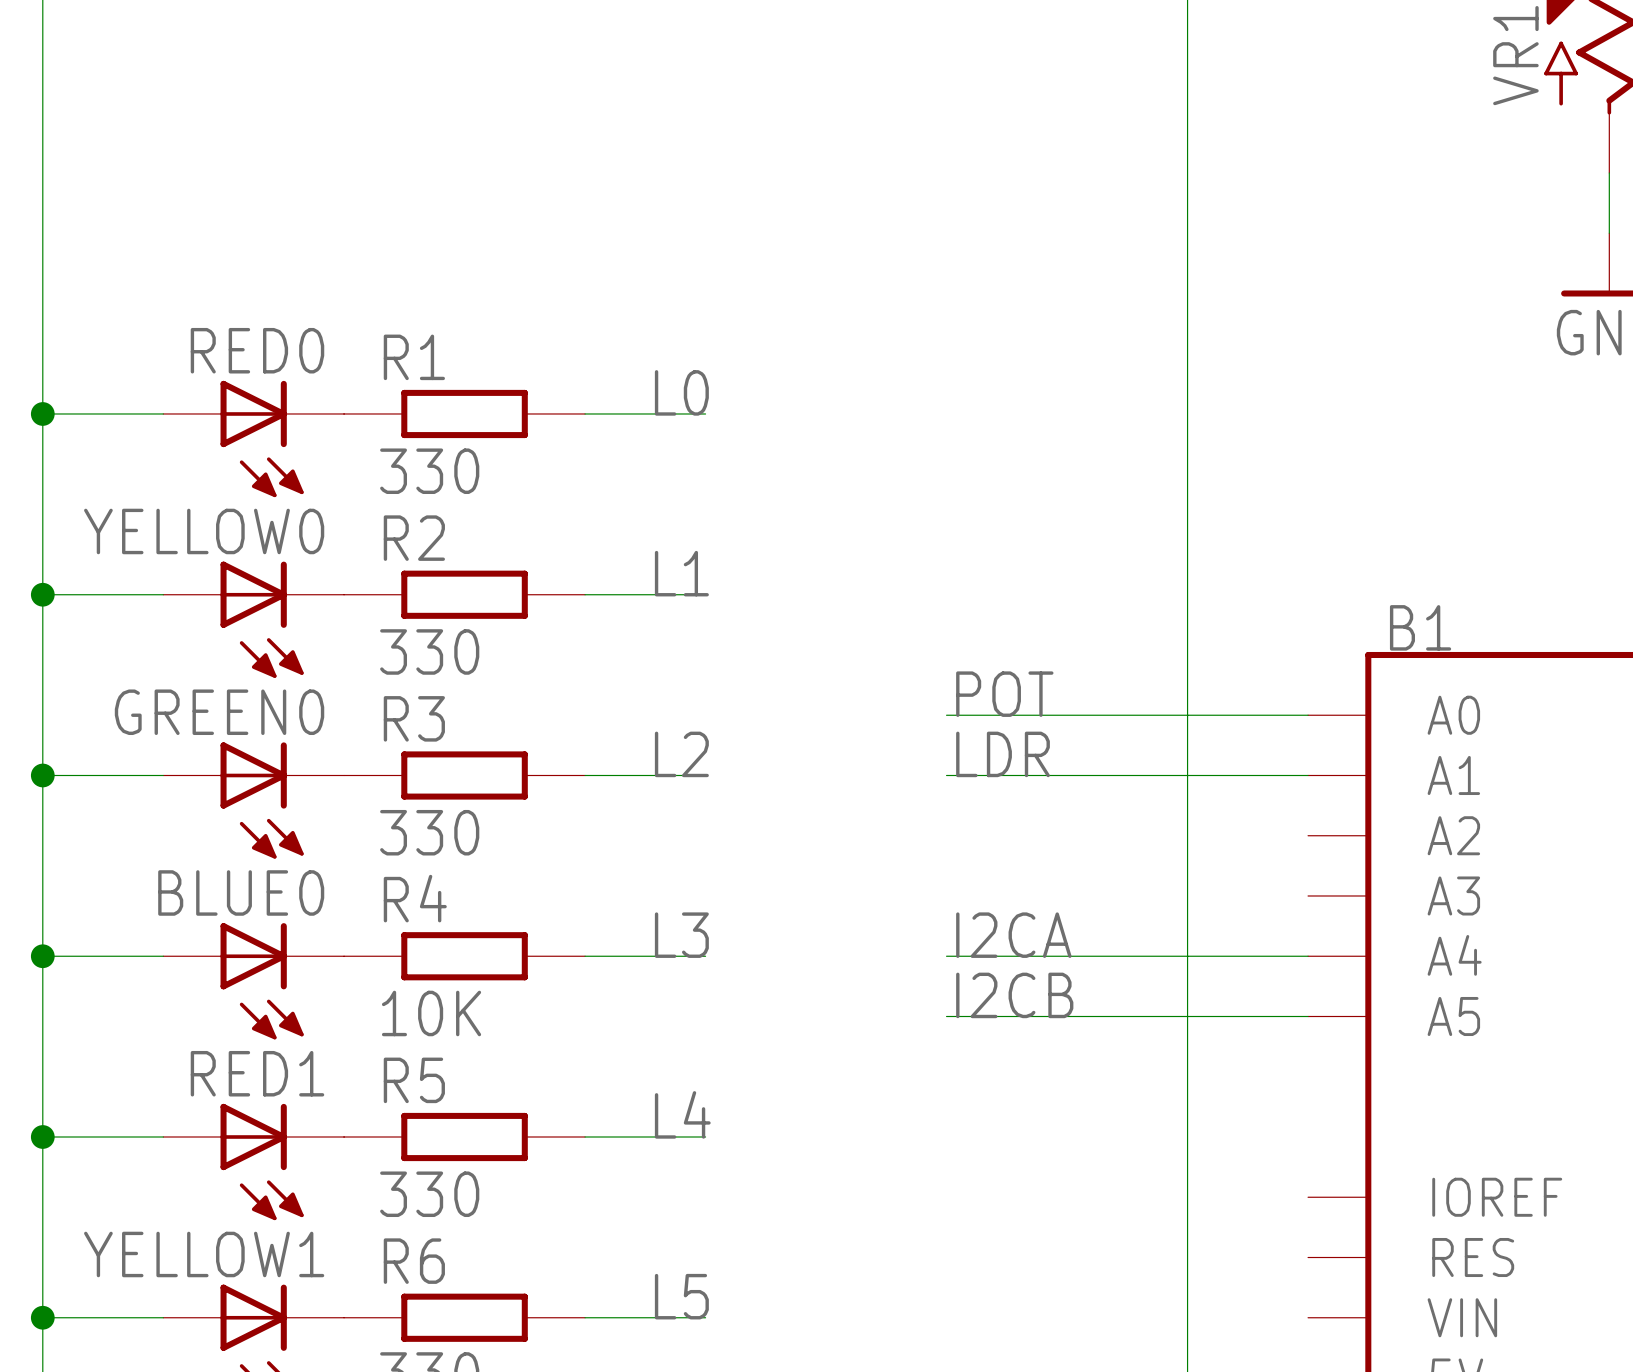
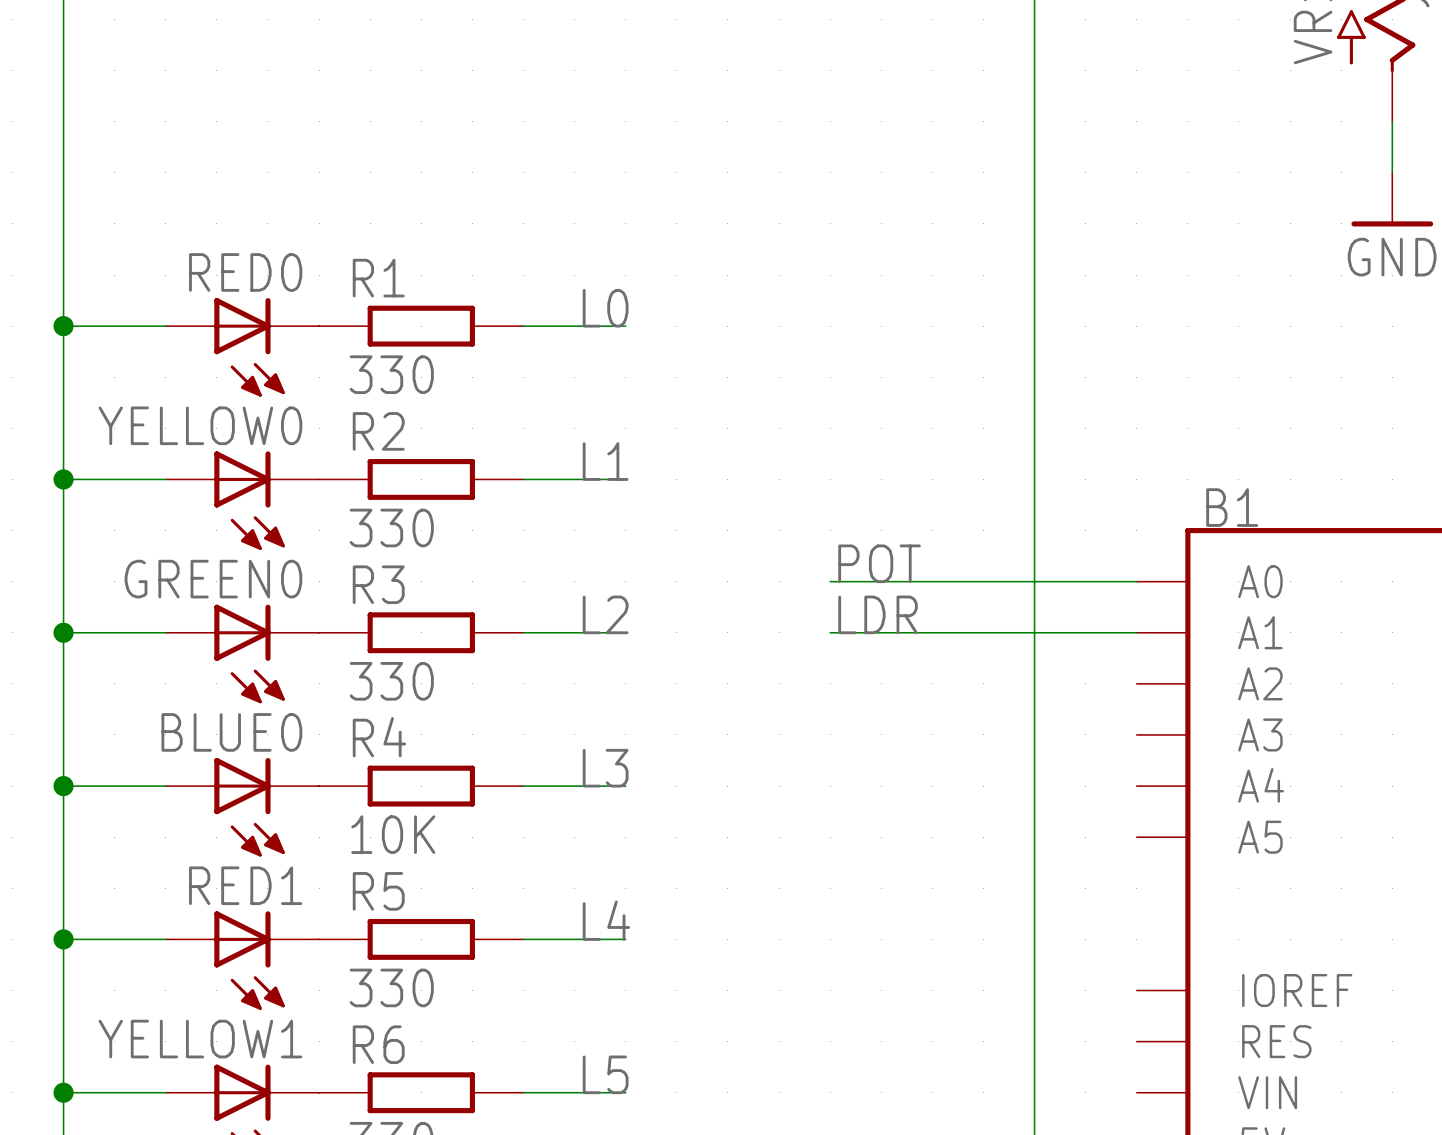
label: I2CA (1013, 935) -> none
wire: (946, 956) (1308, 956) -> none
label: I2CB (1014, 995) -> none
wire: (946, 1016) (1308, 1016) -> none

